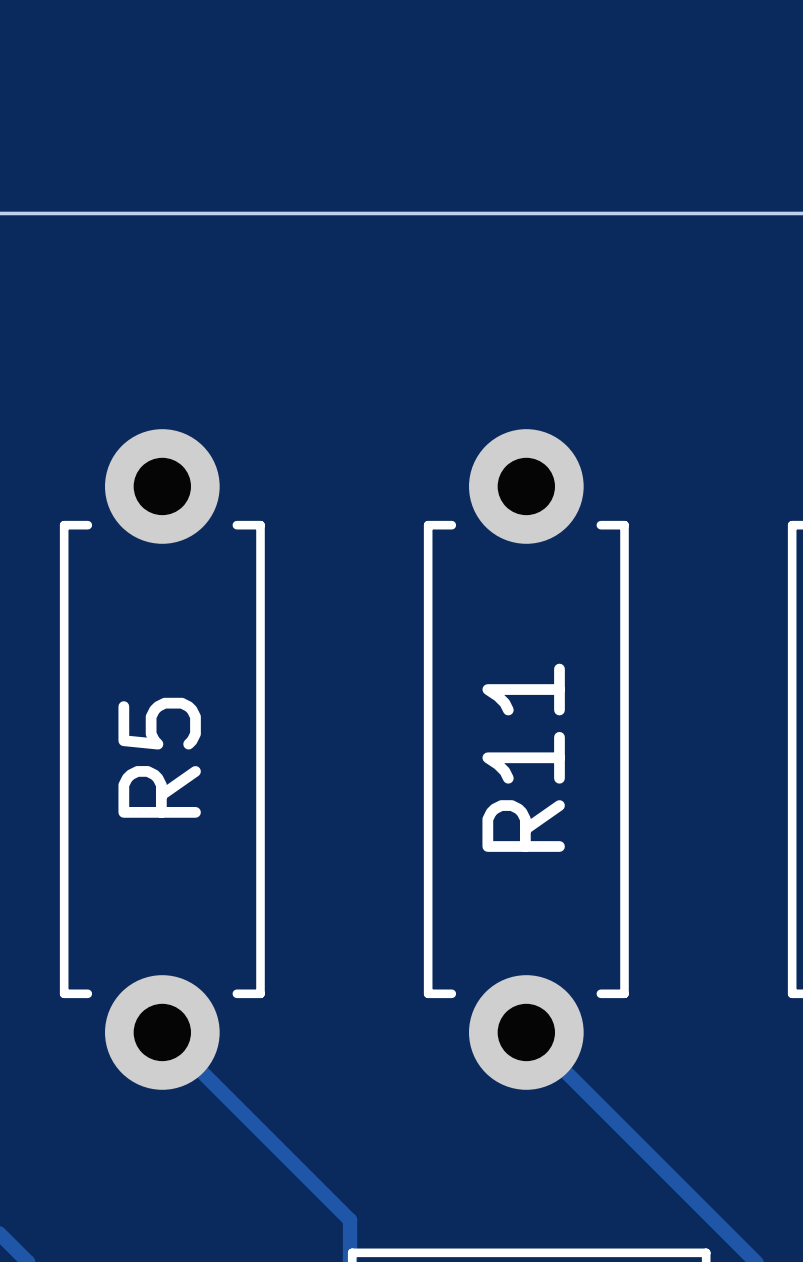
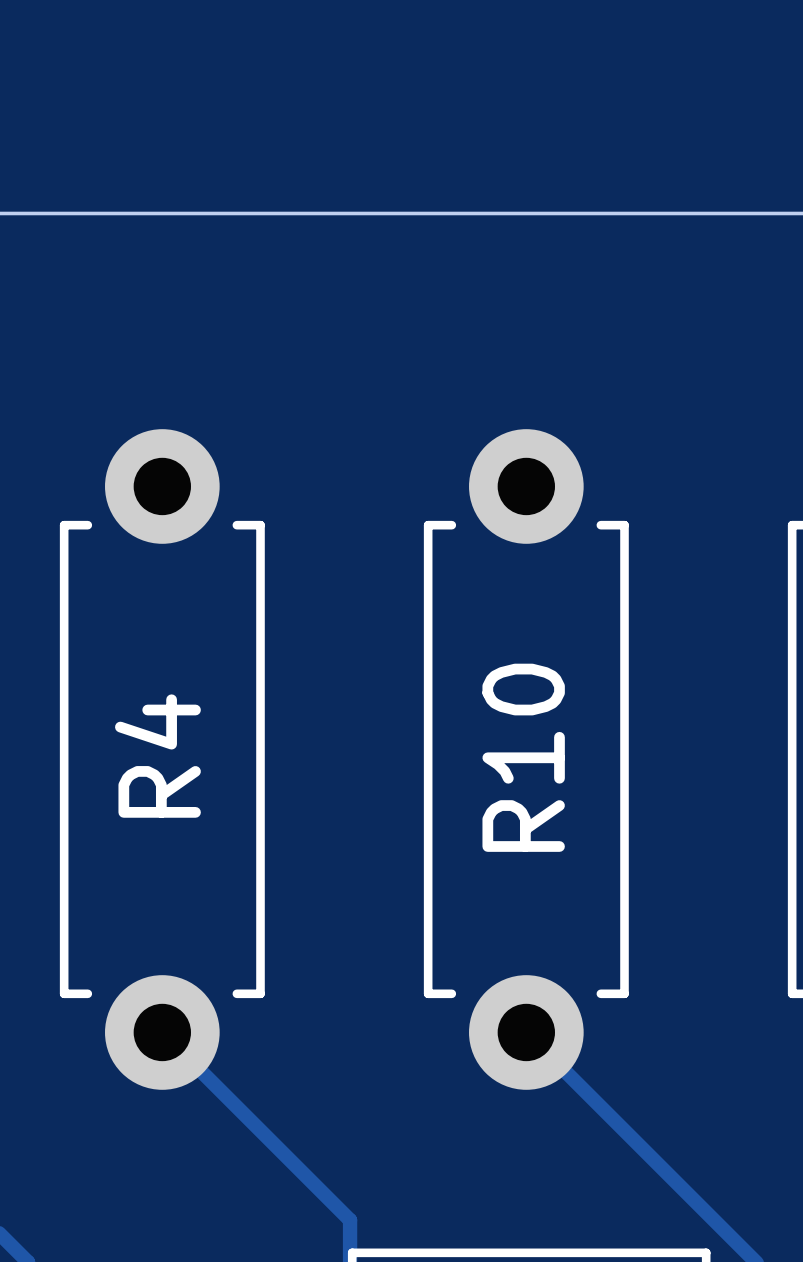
R5 name: R5 (159, 757) -> R4 (157, 756)
R11 name: R11 (523, 757) -> R10 (523, 757)

